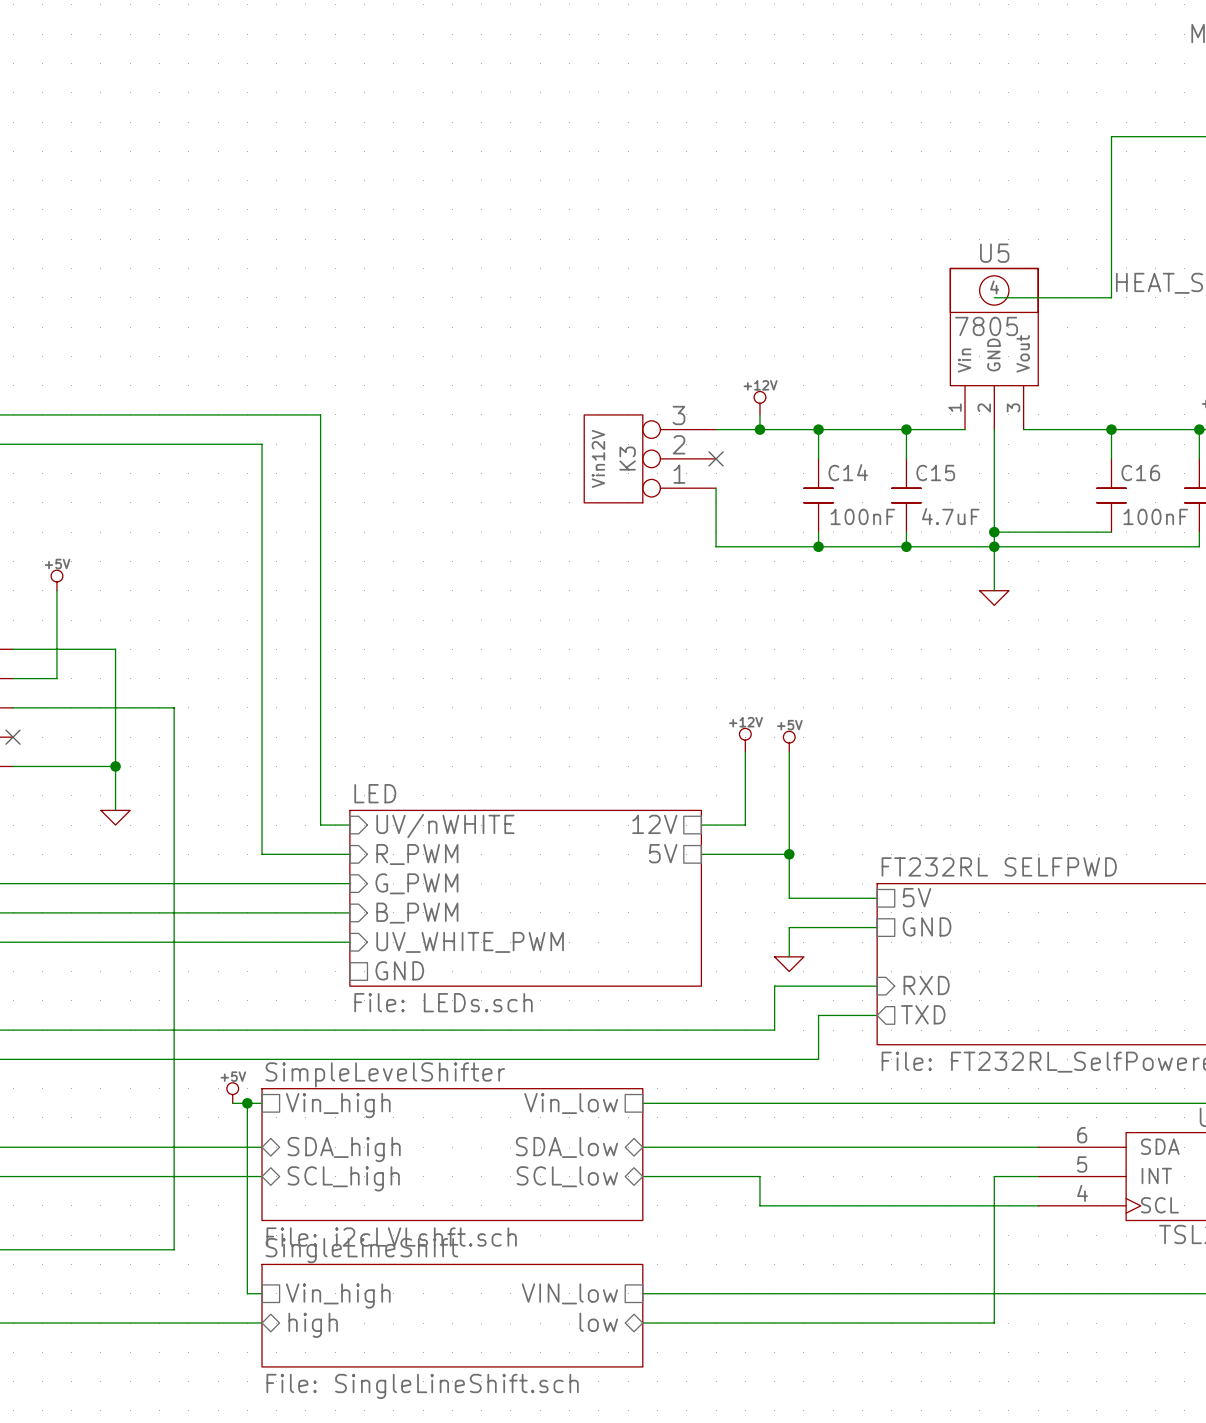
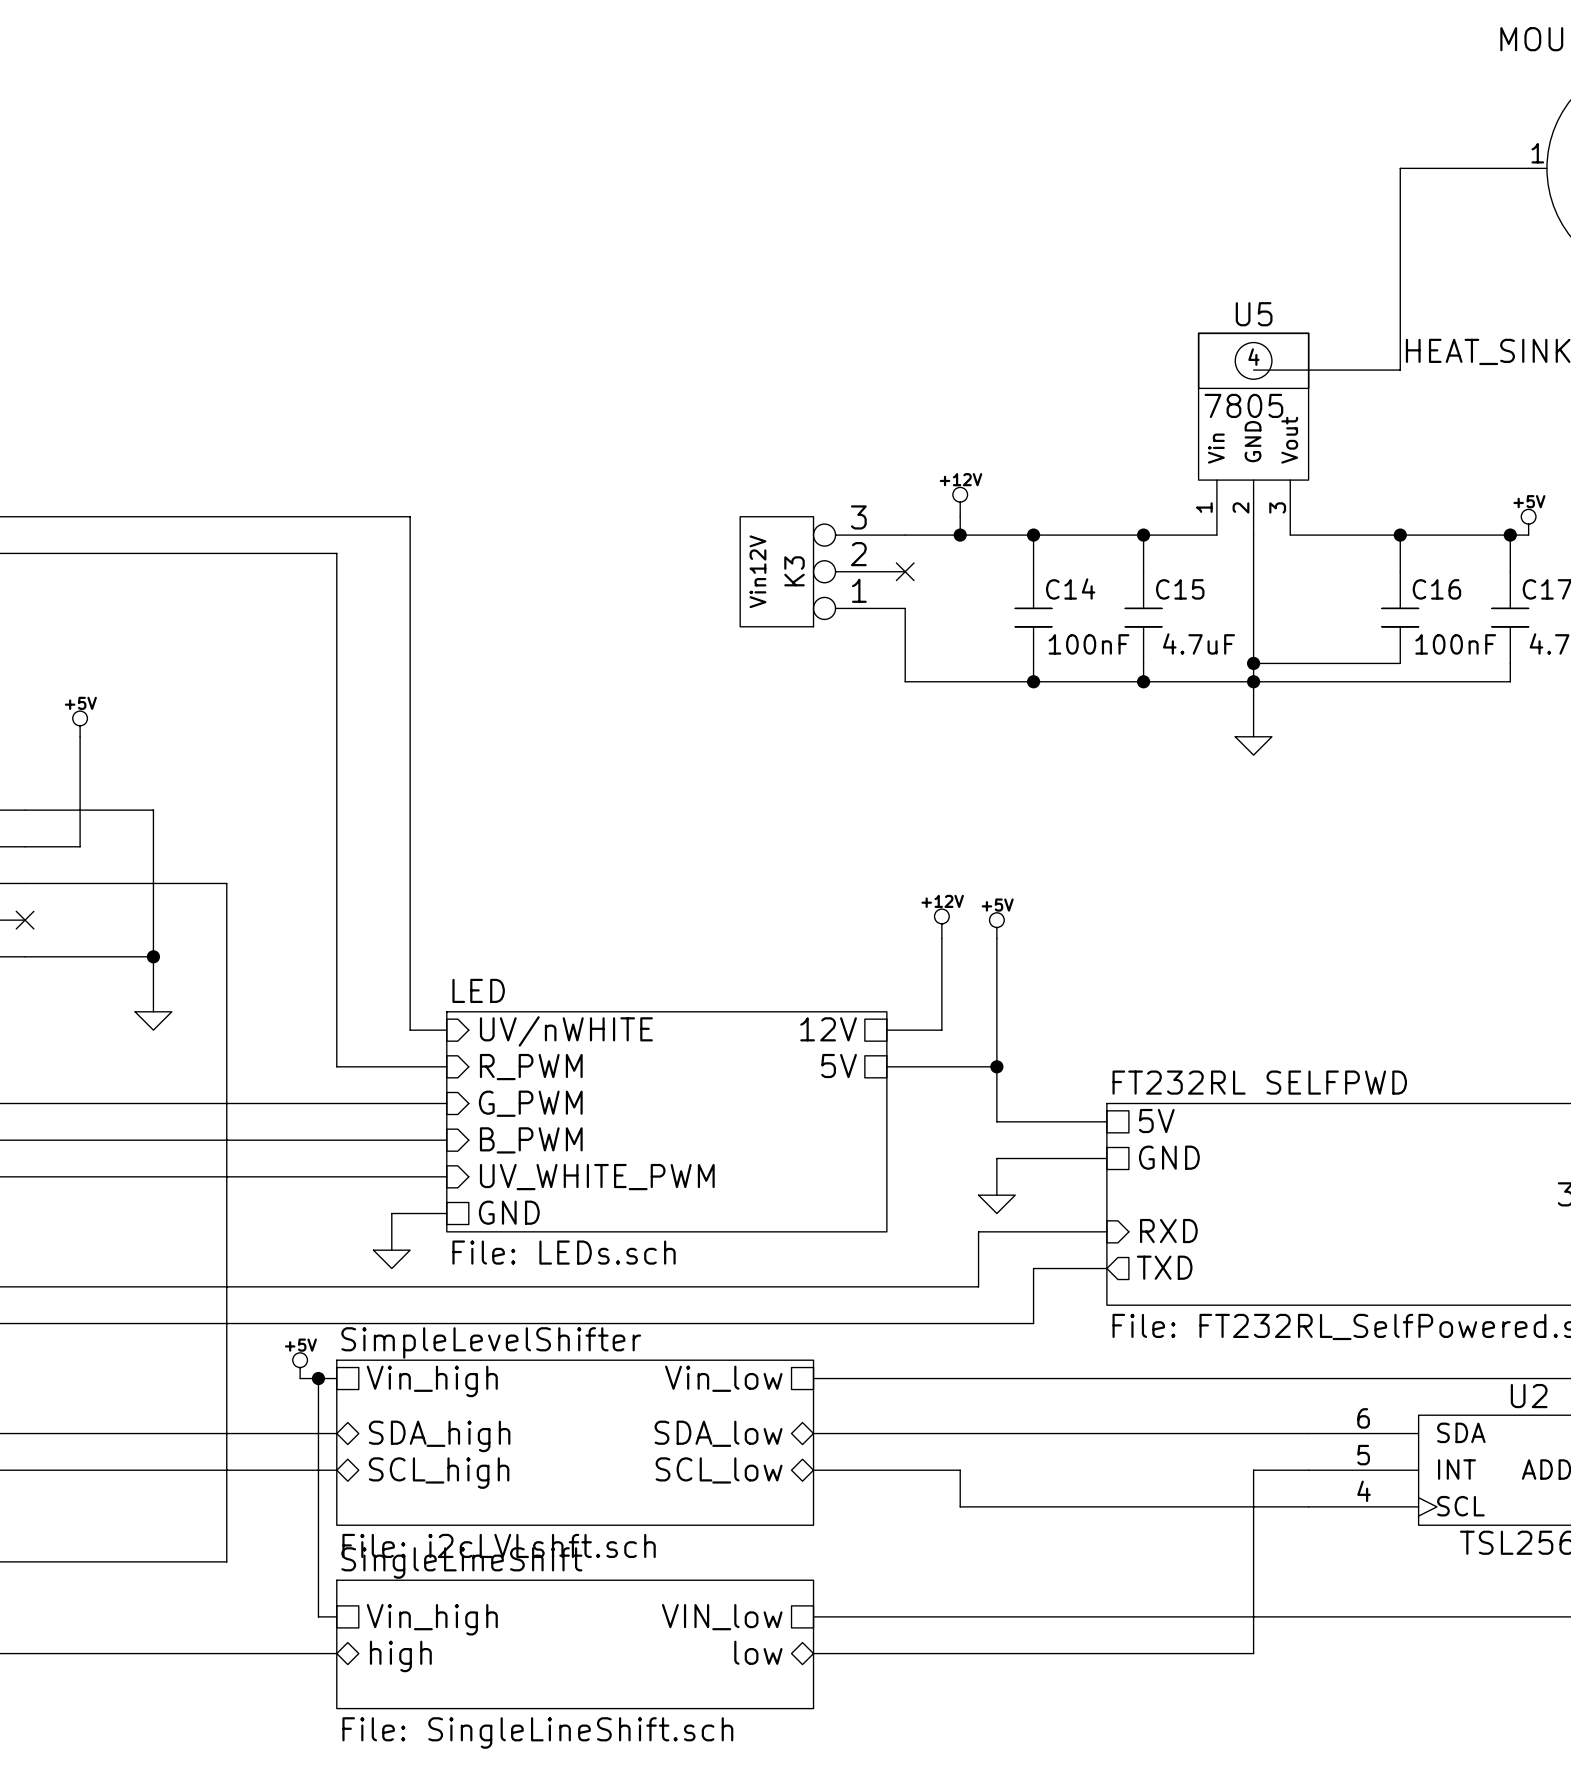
wire: none -> (446, 1213) (391, 1213) (391, 1250)
power symbol: none -> (391, 1259)

